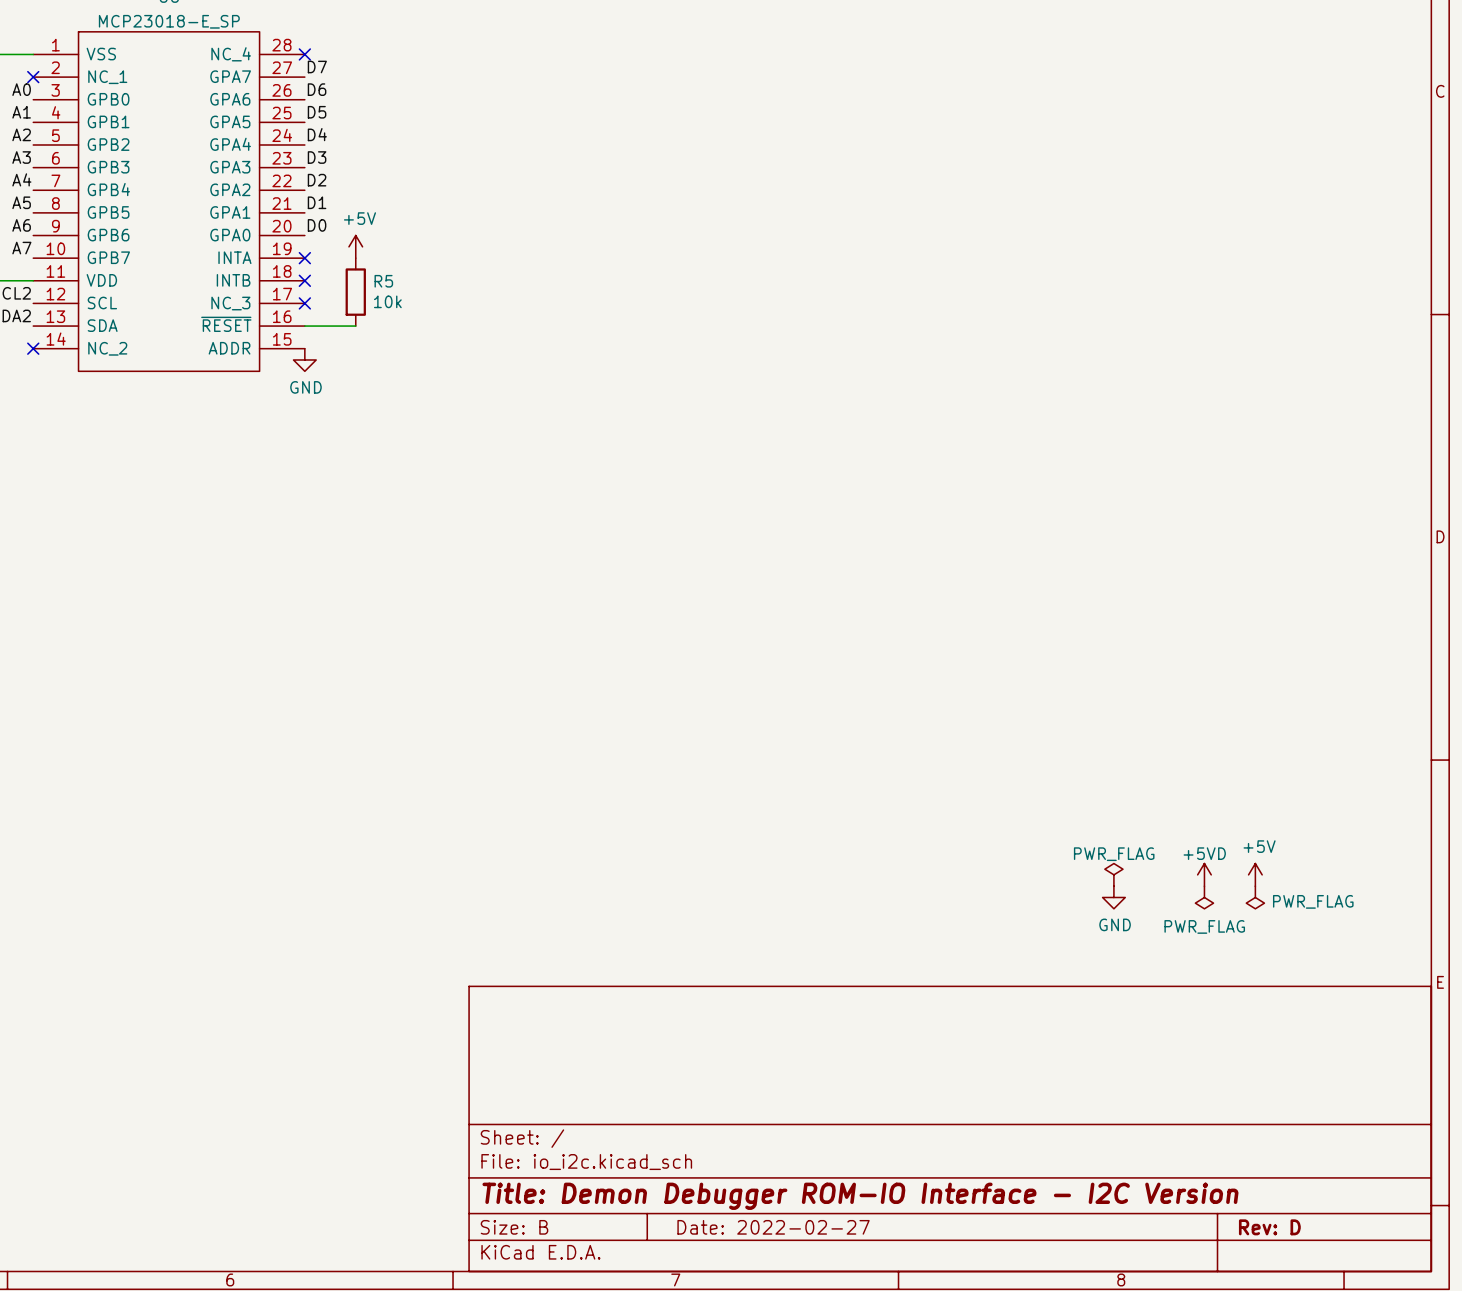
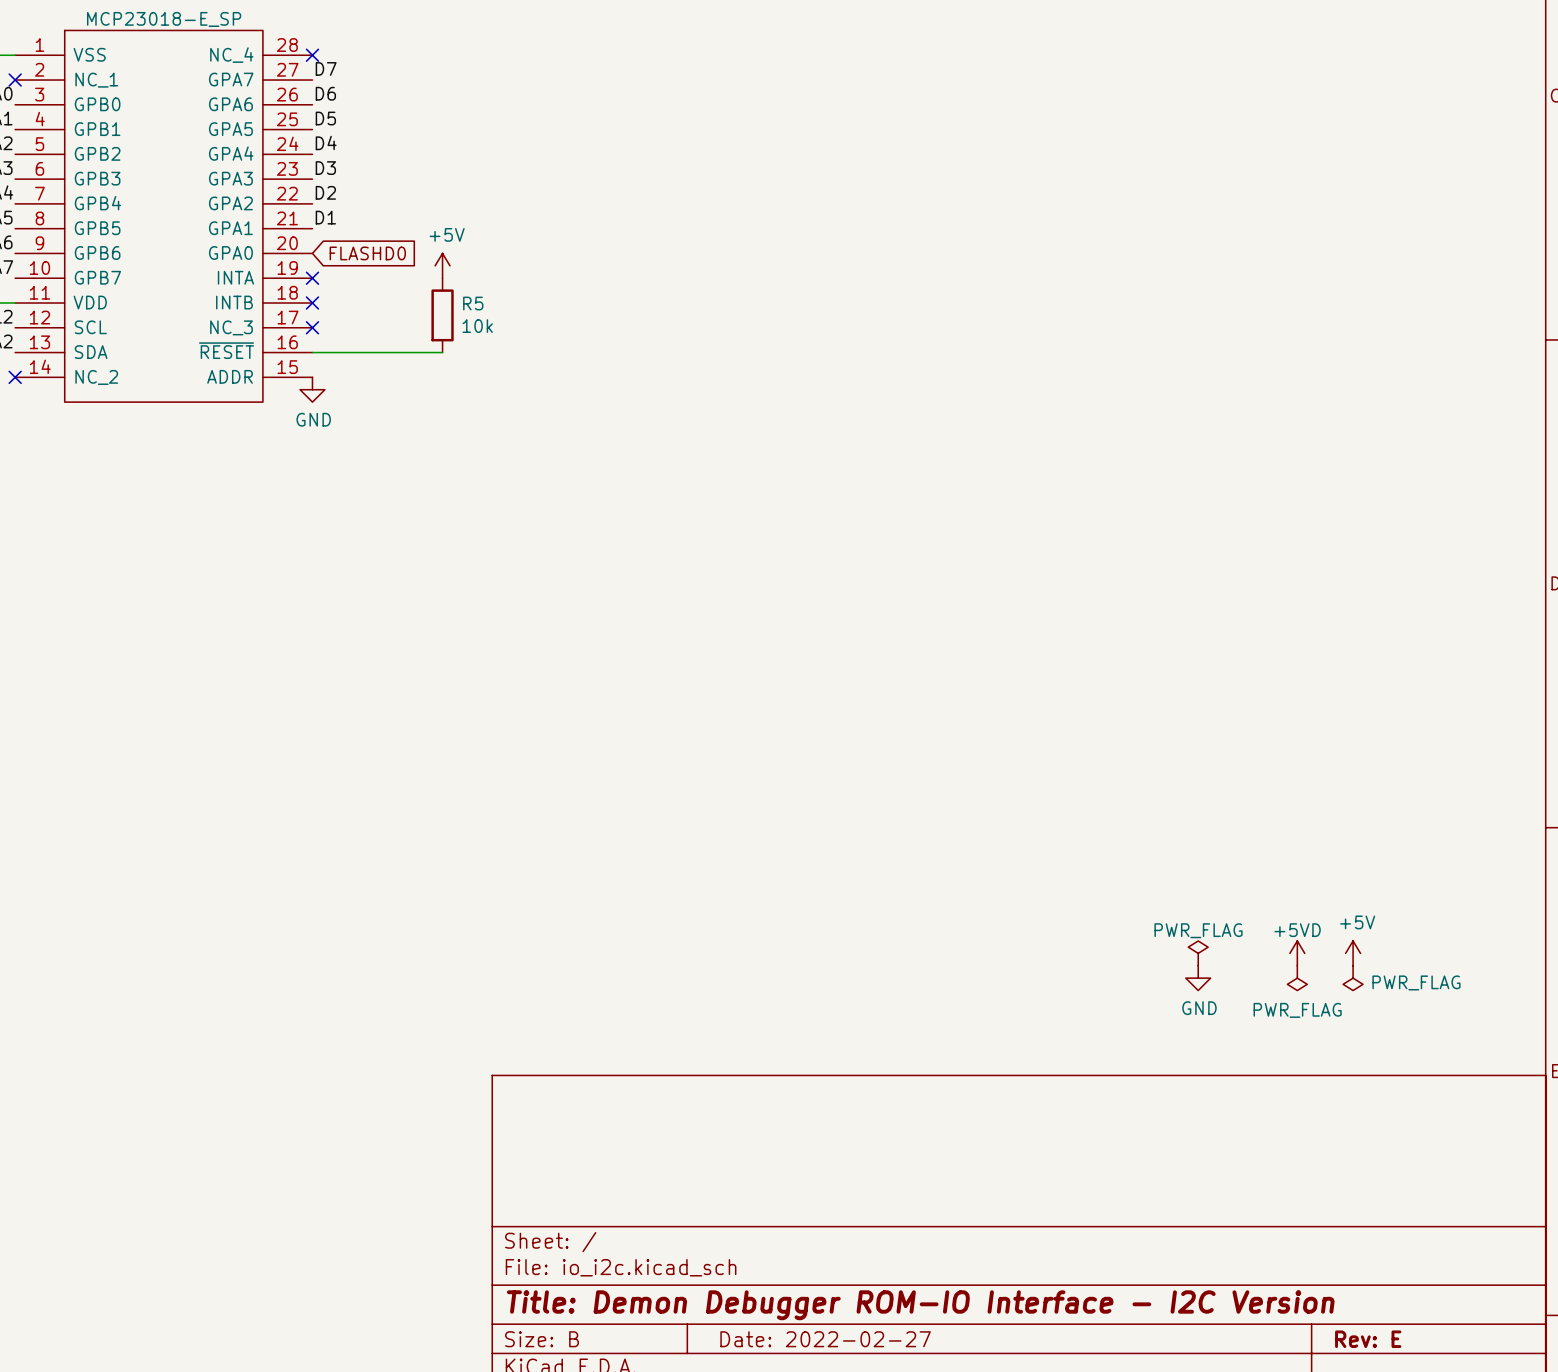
label: D0 (317, 225) -> none
global label: none -> FLASHD0 (367, 253)
power symbol position: +5V (355, 246) -> +5V (442, 265)
R5 position: (355, 292) -> (442, 315)
wire: none -> (368, 352) (442, 352)
title block: Rev: D (1269, 1227) -> Rev: E (1368, 1339)

